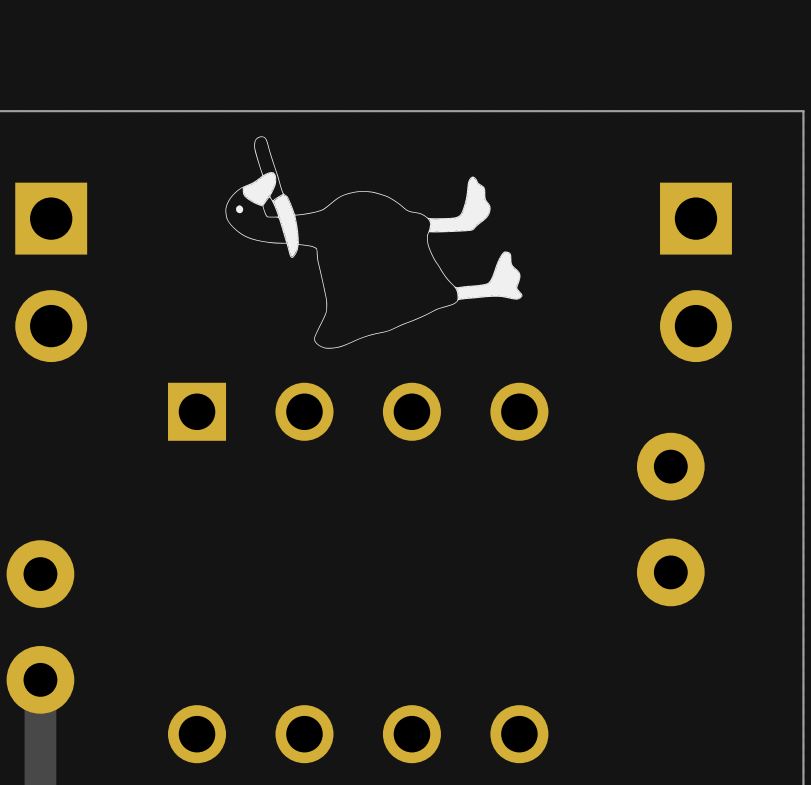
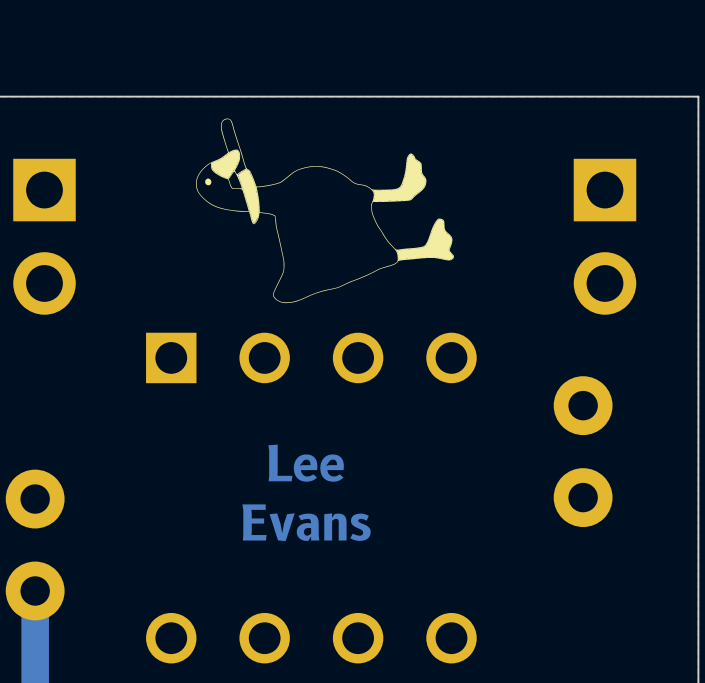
text: none -> Lee (306, 463)
text: none -> Evans (306, 522)

